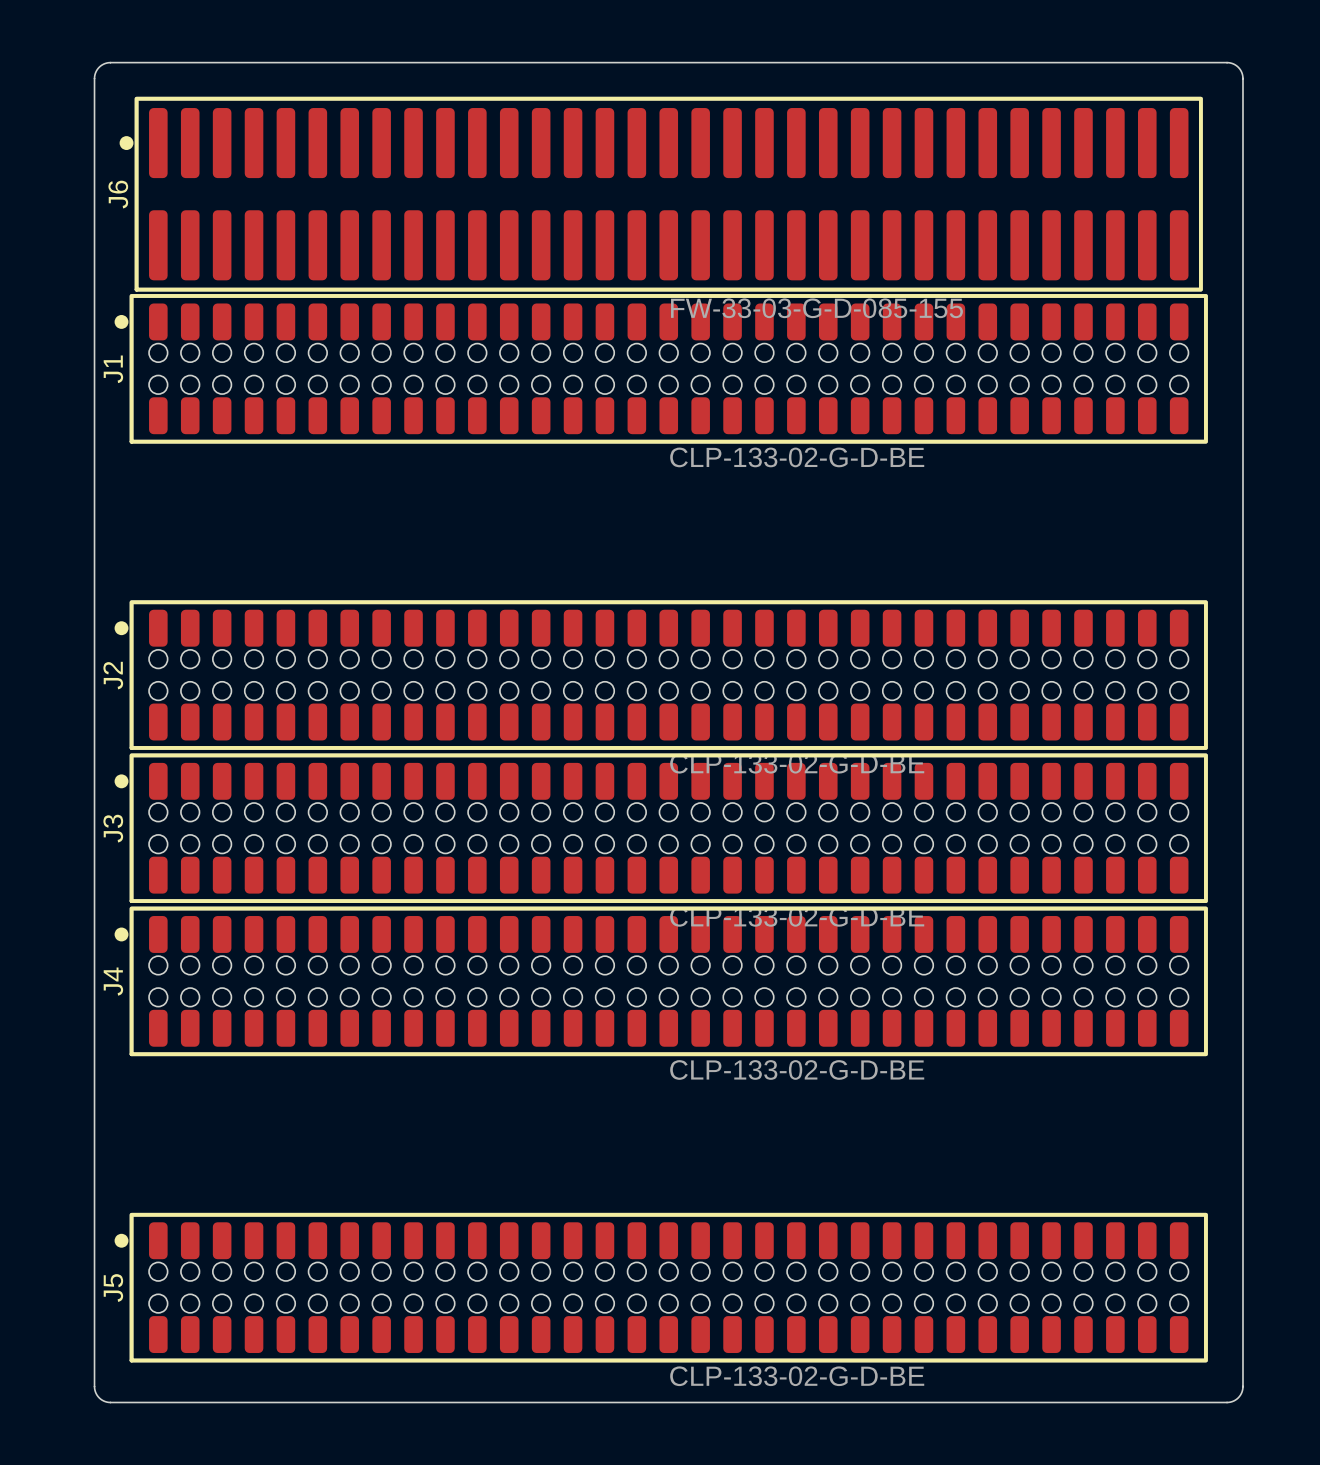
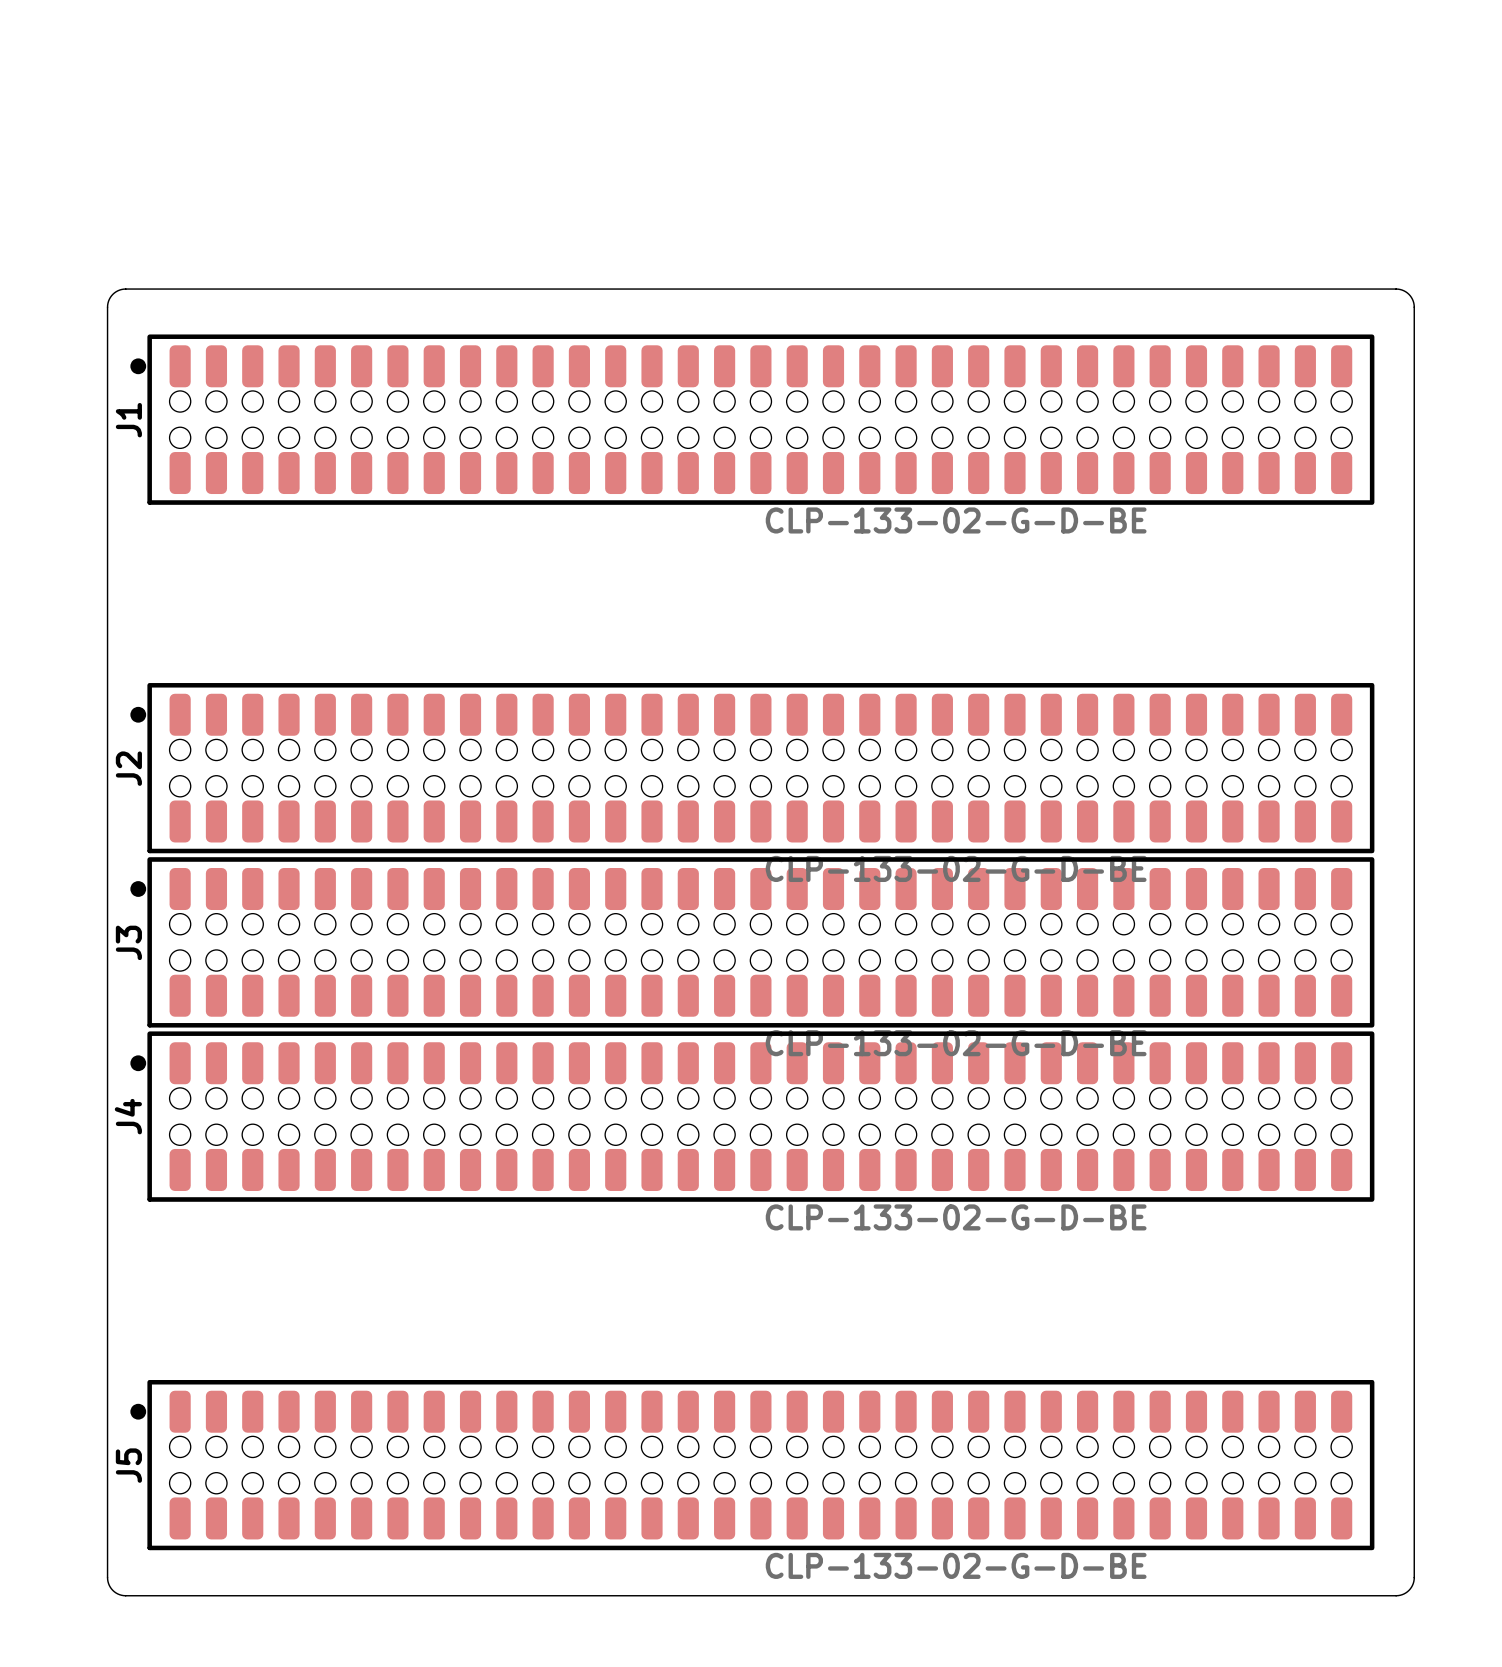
J6: FW-33-03-G-D-085-155 (661, 194) -> none
board edge: (94, 269) (94, 76) (100, 66) (110, 62) (1230, 63) (1239, 68) (1242, 76) (1242, 269) -> (107, 307) (112, 294) (125, 289) (1396, 289) (1408, 294) (1414, 307)

